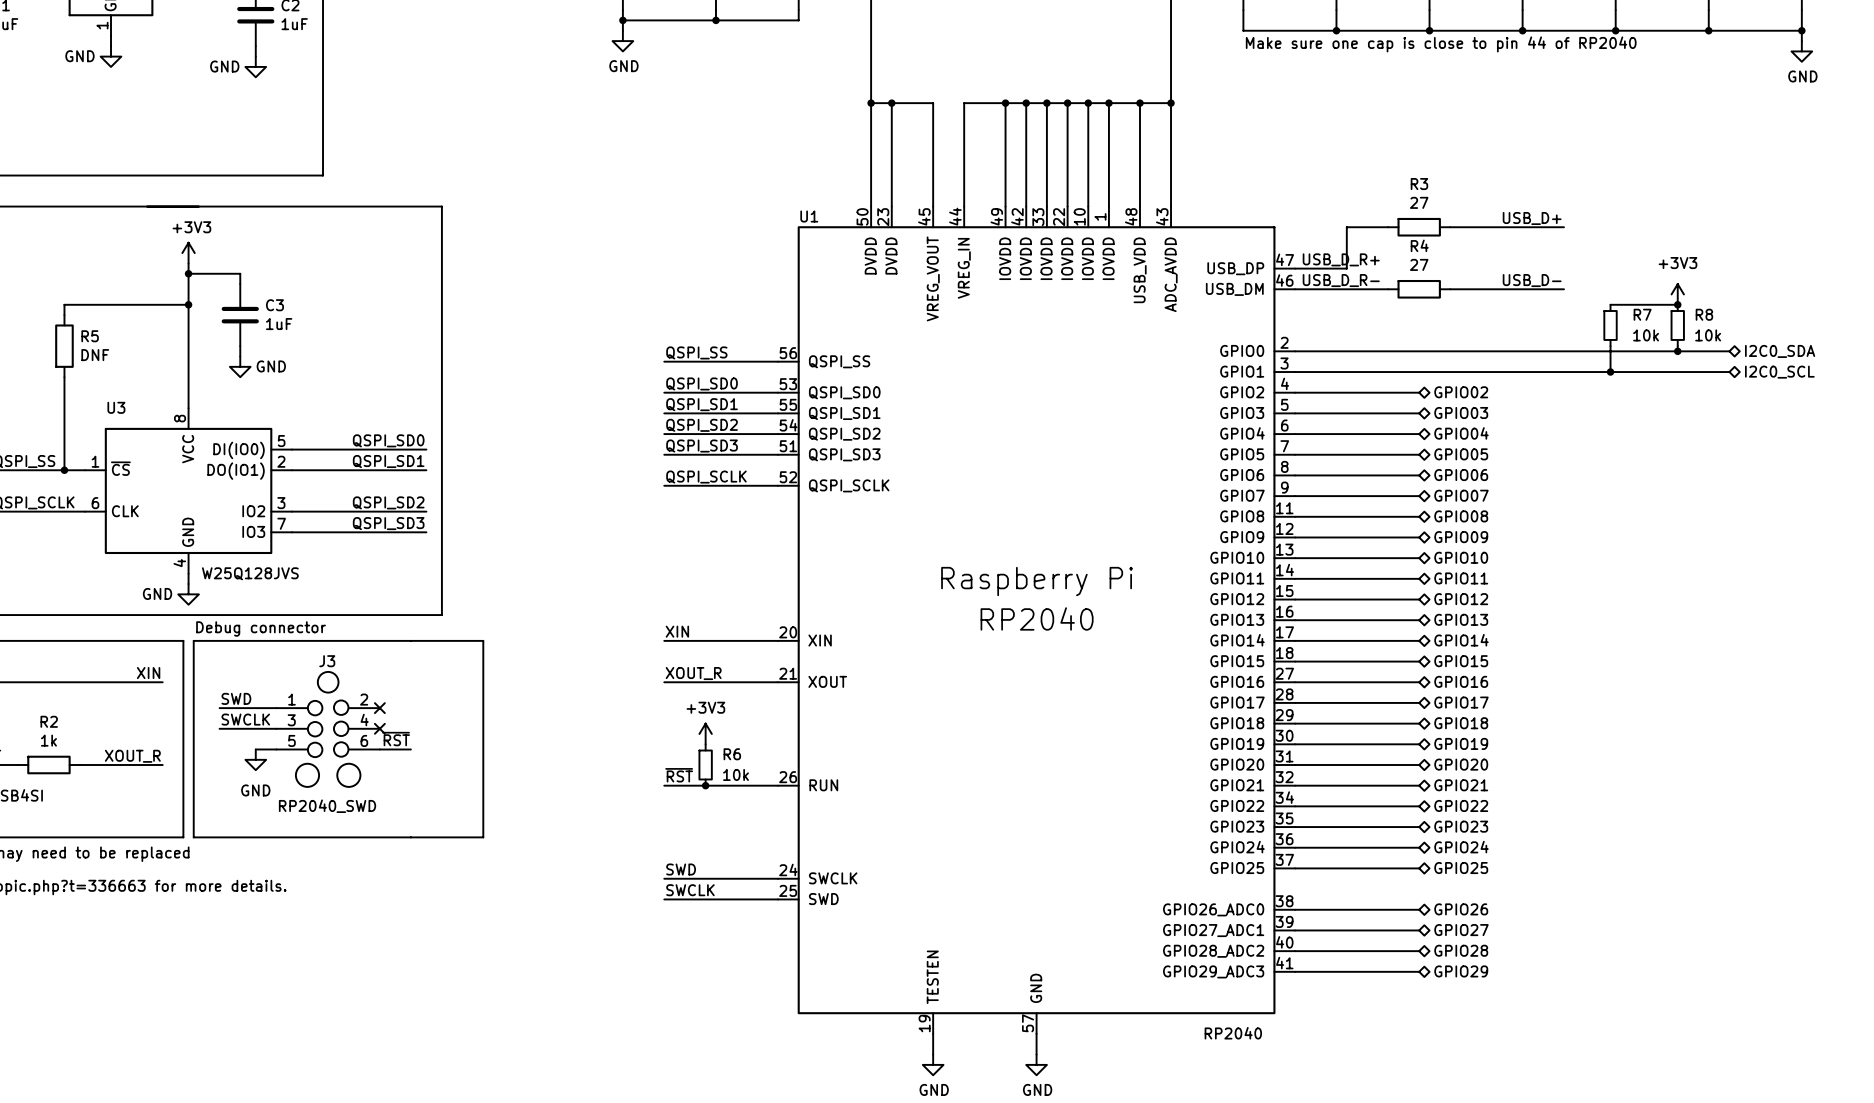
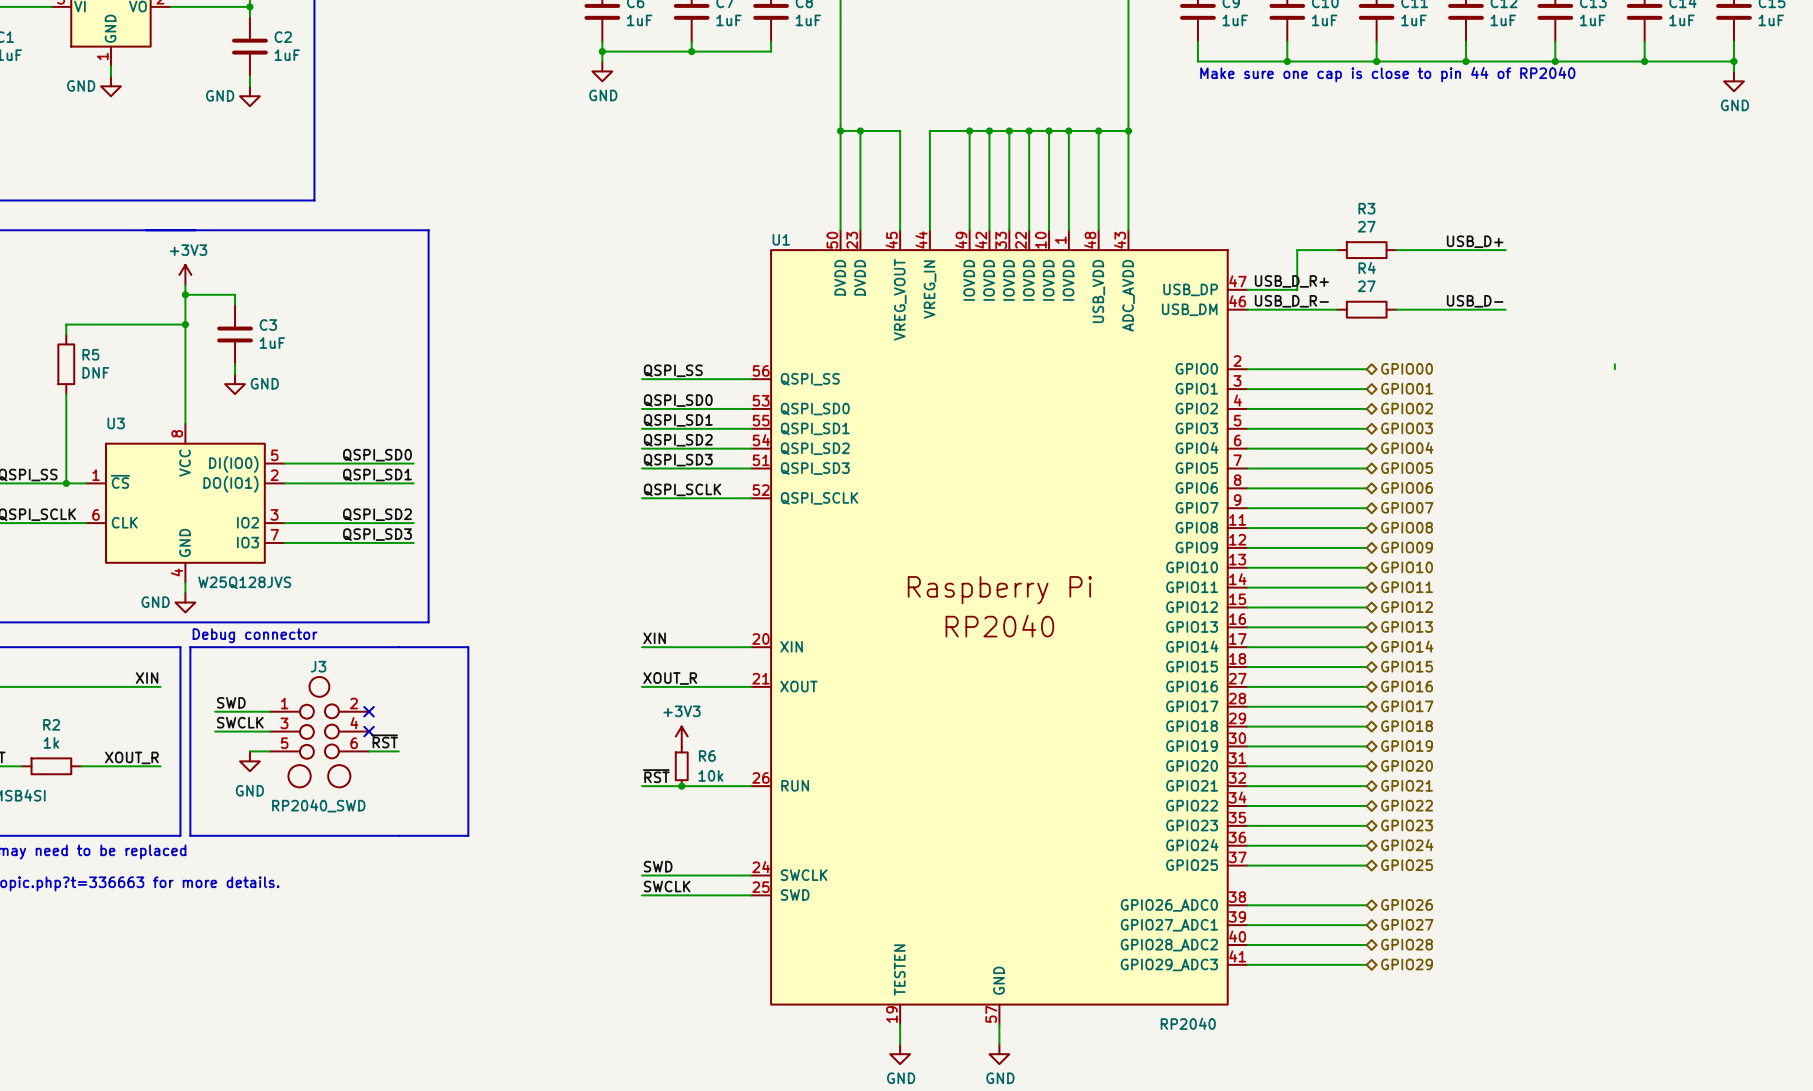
power symbol: +3V3 (1677, 294) -> none
wire: (1610, 304) (1677, 304) -> none
junction: (1677, 304) -> none
R7: 10k (1610, 325) -> none
R8: 10k (1677, 325) -> none
wire: (1610, 346) (1610, 372) -> none
hierarchical label: none -> GPIO00 (1407, 368)
wire: (1419, 351) (1729, 351) -> none
junction: (1677, 351) -> none
hierarchical label: I2C0_SDA (1780, 351) -> none
hierarchical label: none -> GPIO01 (1407, 388)
wire: (1419, 372) (1729, 372) -> none
junction: (1610, 372) -> none
hierarchical label: I2C0_SCL (1779, 372) -> none

